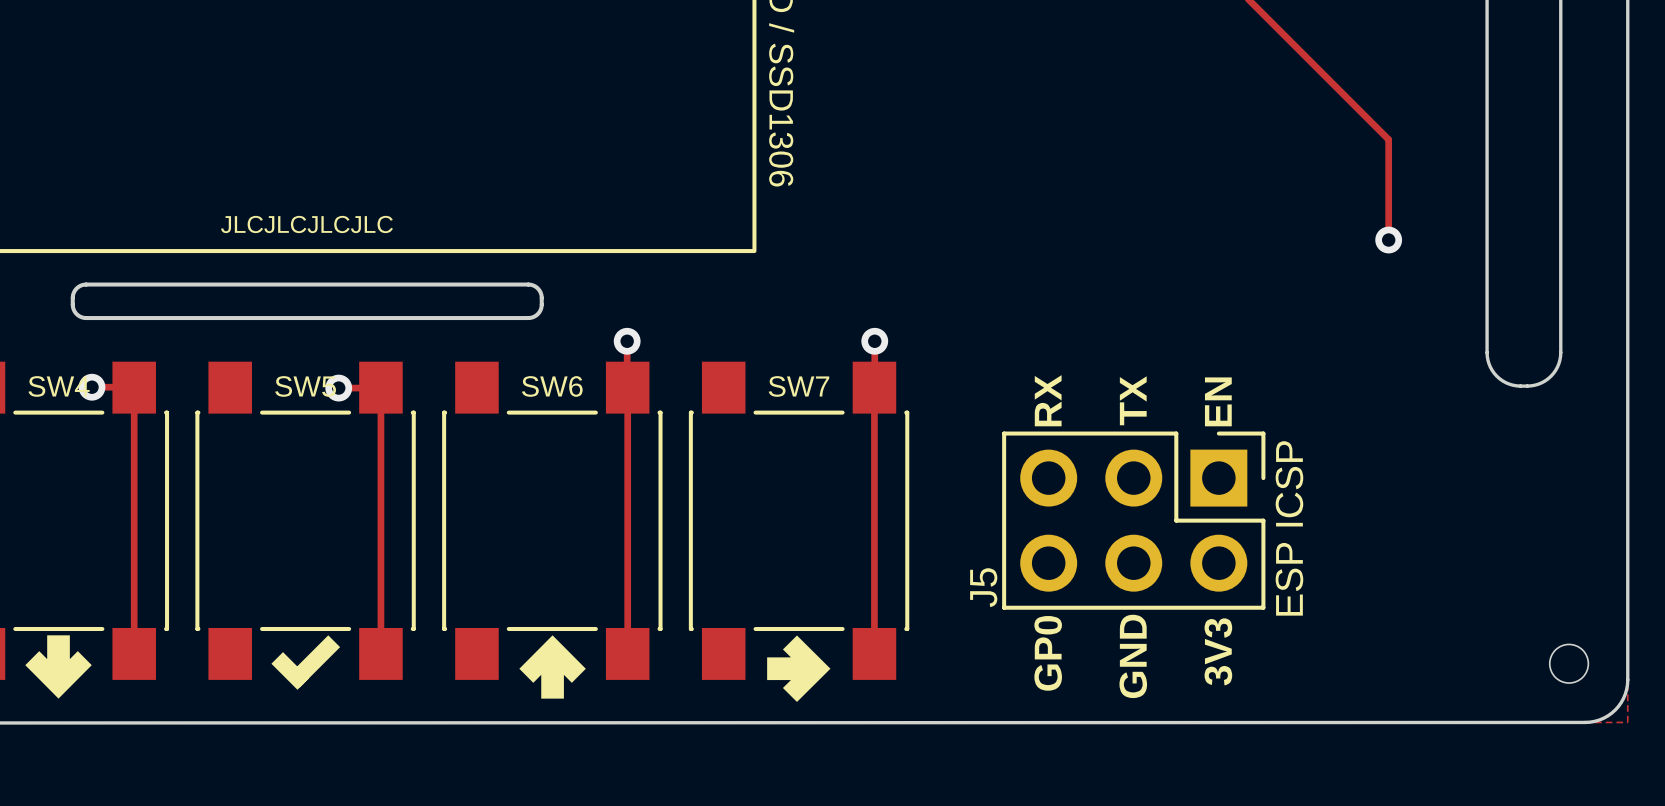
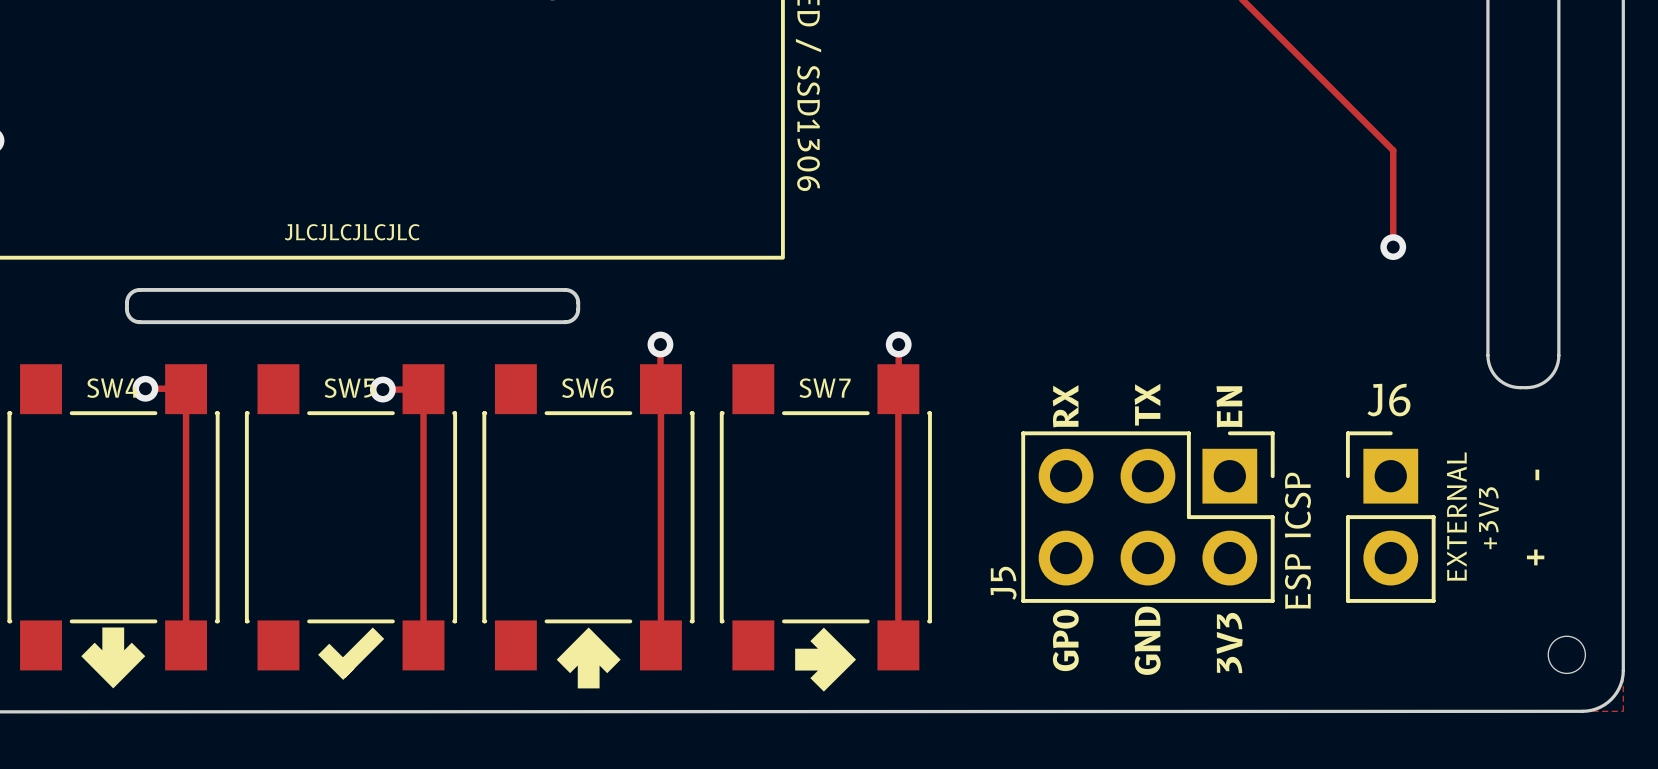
text: none -> - (1537, 474)
J6: none -> (1390, 517)
text: none -> EXTERNAL (1456, 516)
text: none -> +3V3 (1488, 518)
text: none -> + (1535, 557)

